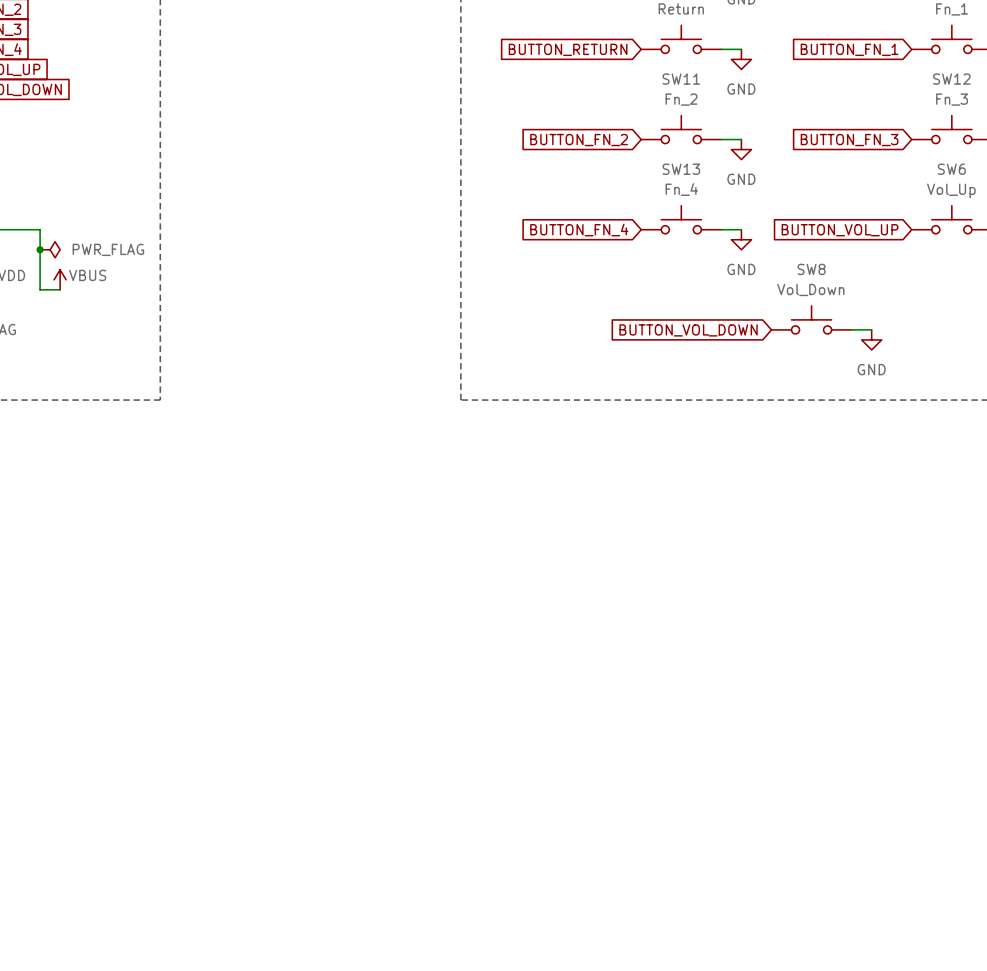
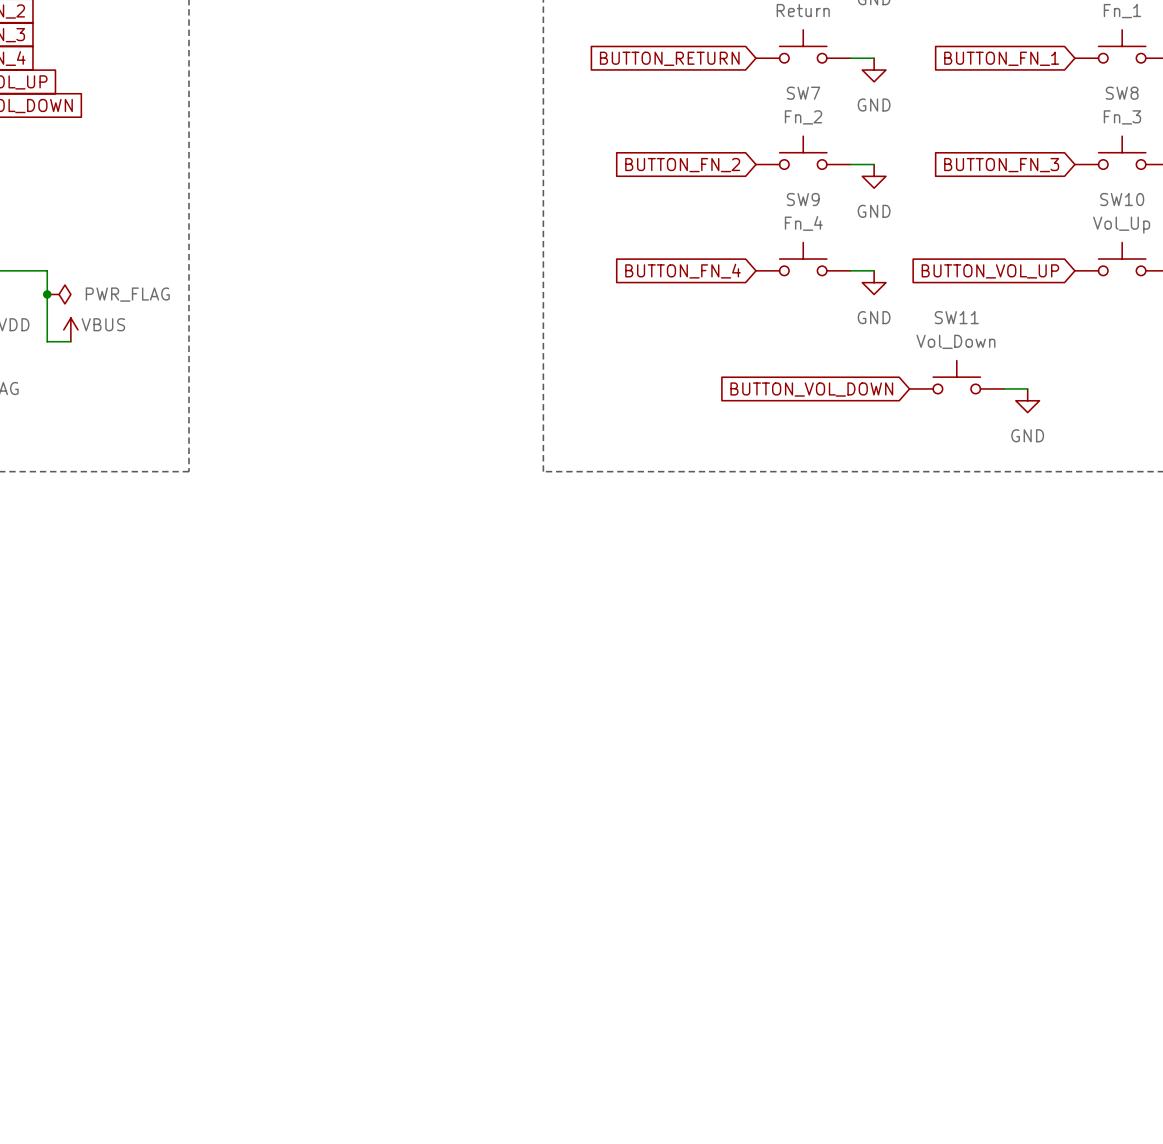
SW11 name: SW11 (681, 79) -> SW7 (803, 93)
SW12 name: SW12 (951, 79) -> SW8 (1122, 93)
SW13 name: SW13 (681, 169) -> SW9 (803, 199)
SW6 name: SW6 (951, 169) -> SW10 (1122, 199)
SW8 name: SW8 (811, 269) -> SW11 (956, 317)

